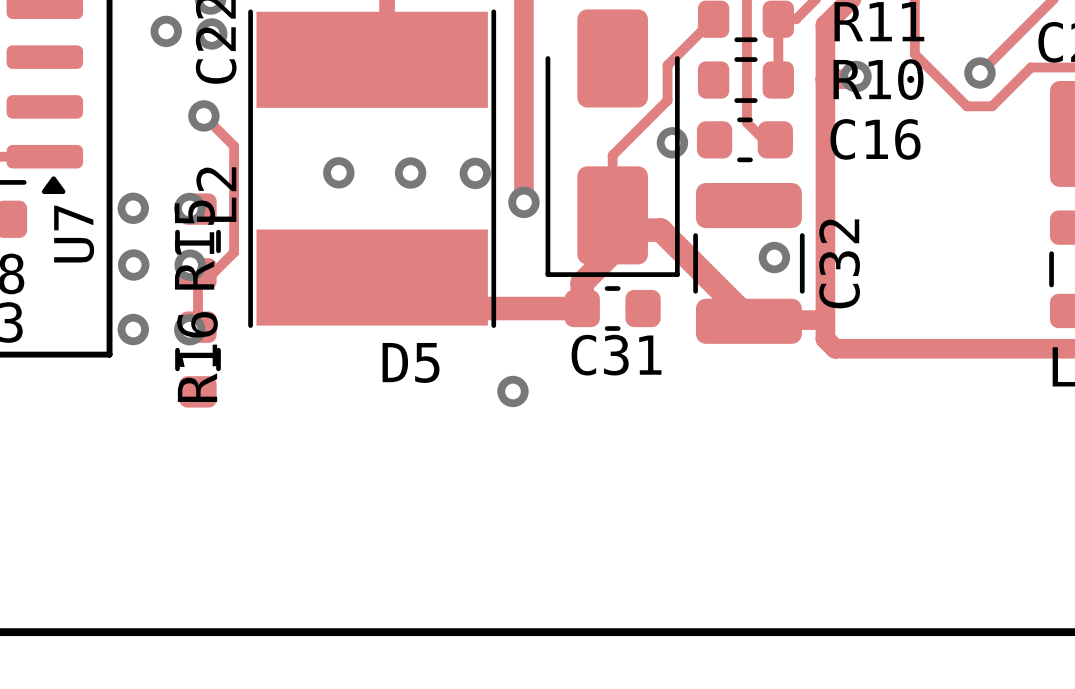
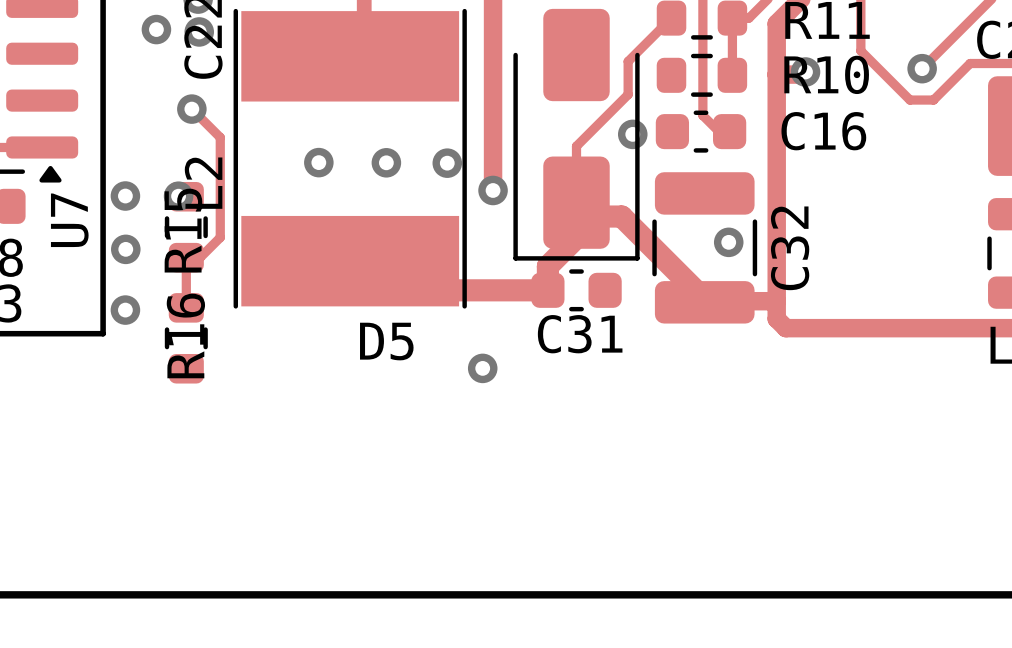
via: (190, 265) -> none
via: (189, 329) -> none

